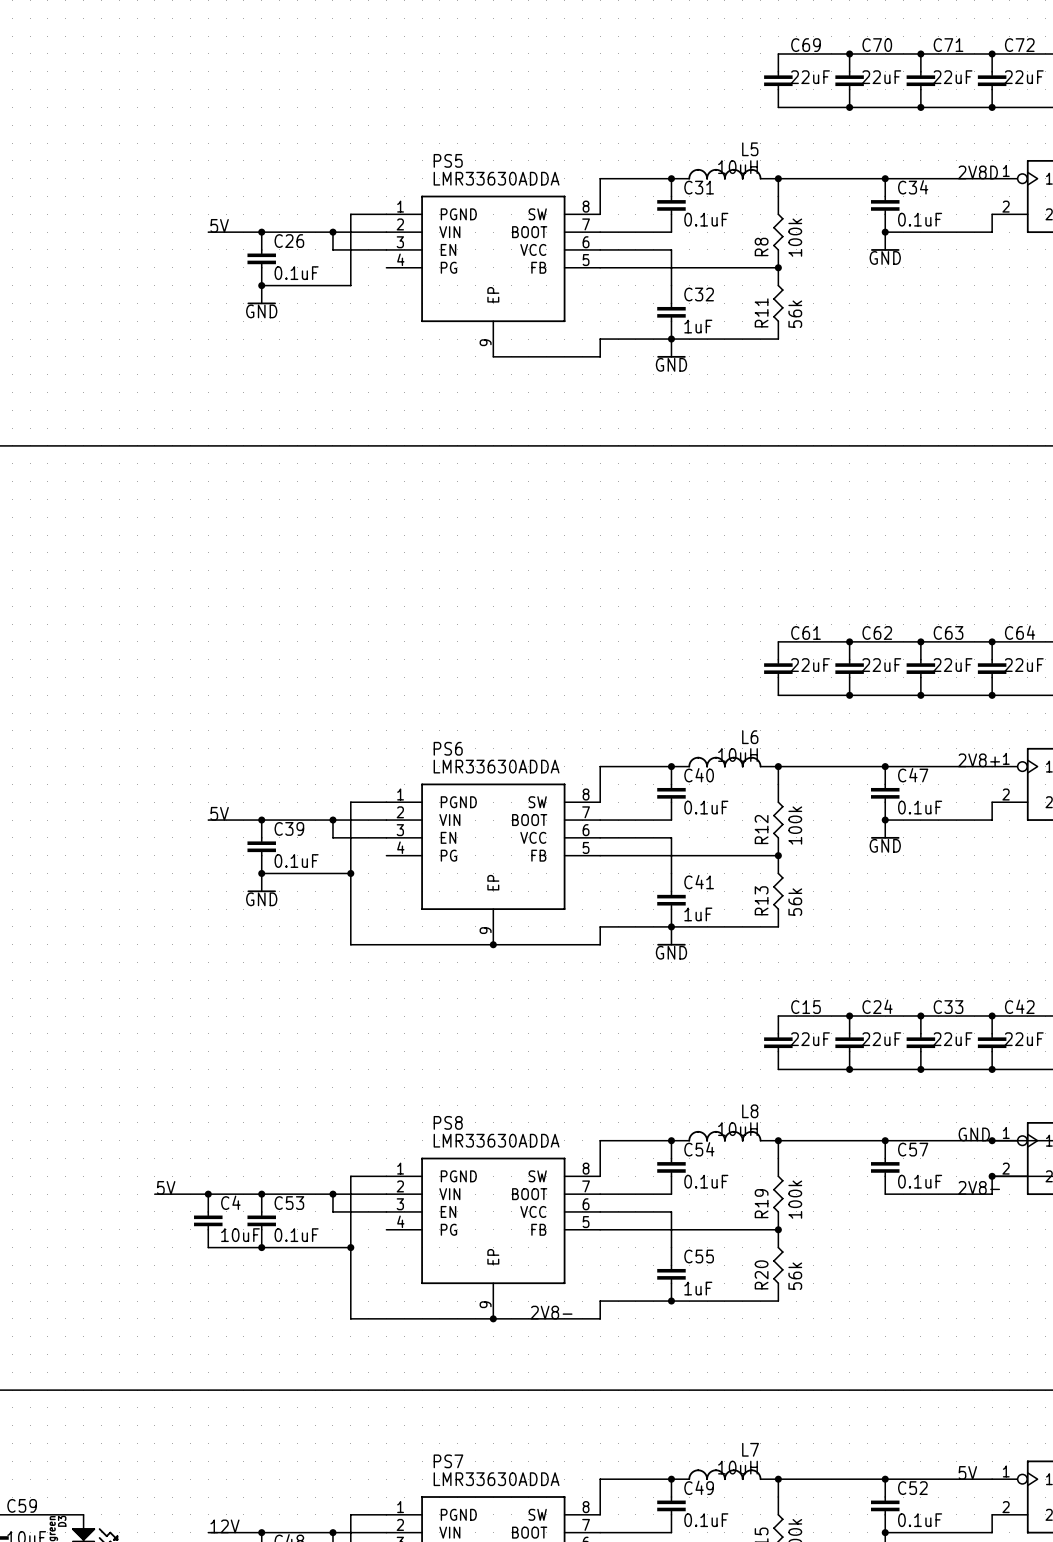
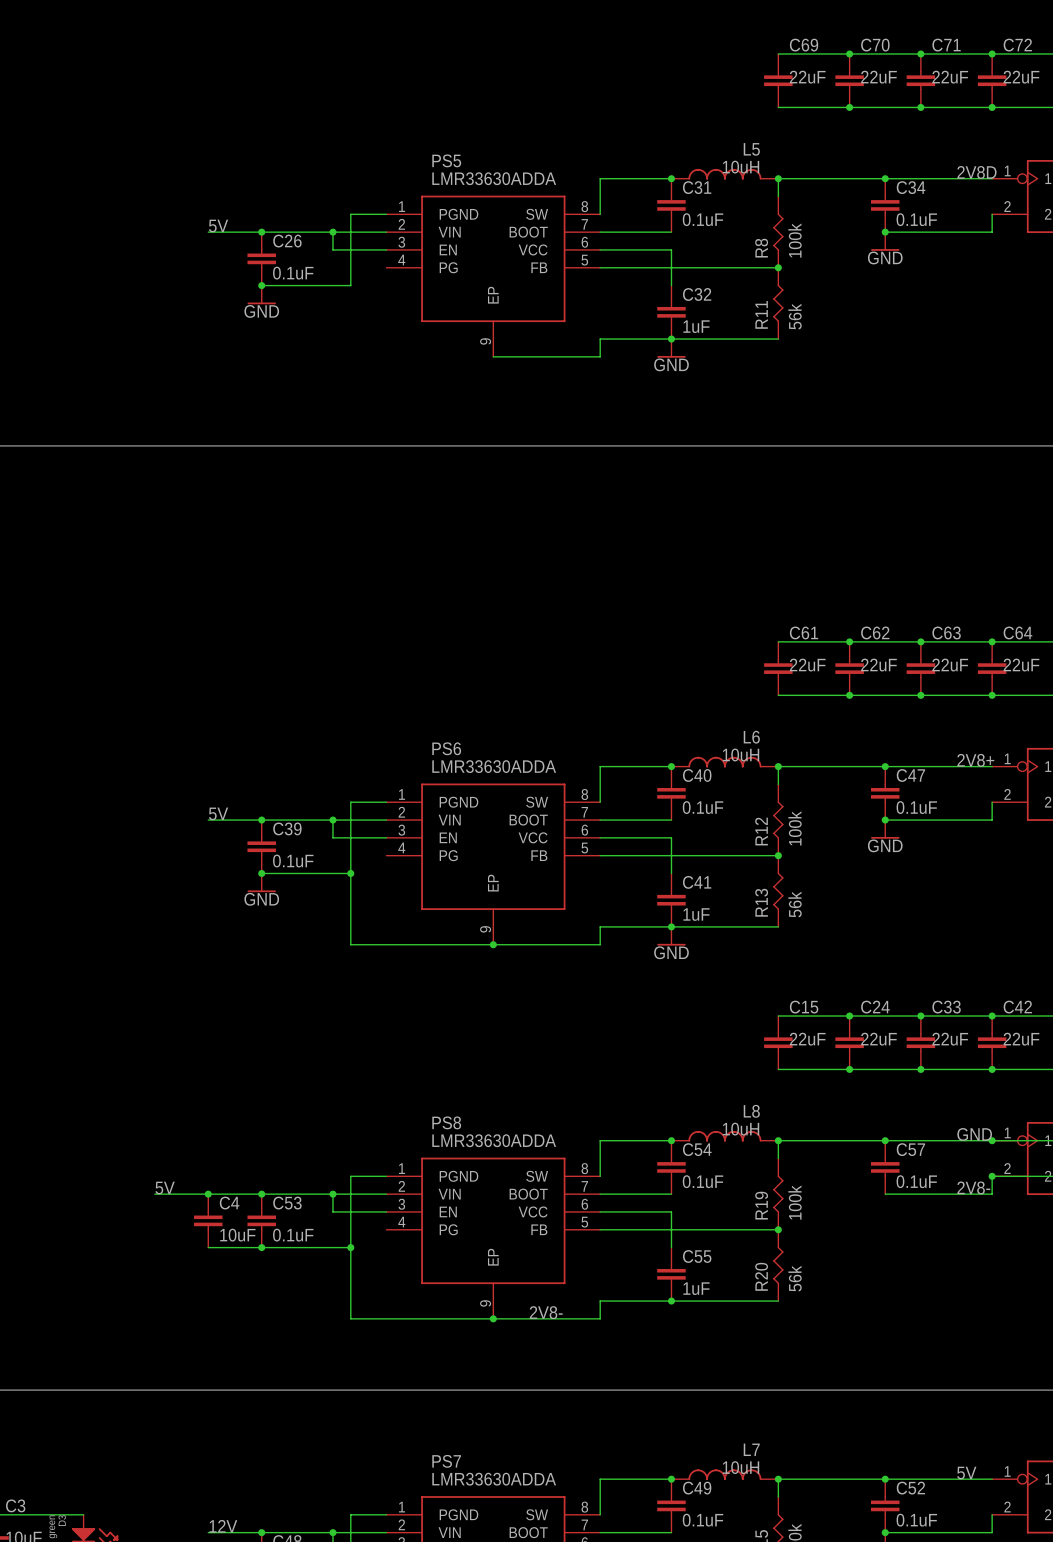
C59 name: C59 (22, 1505) -> C3 (15, 1505)

